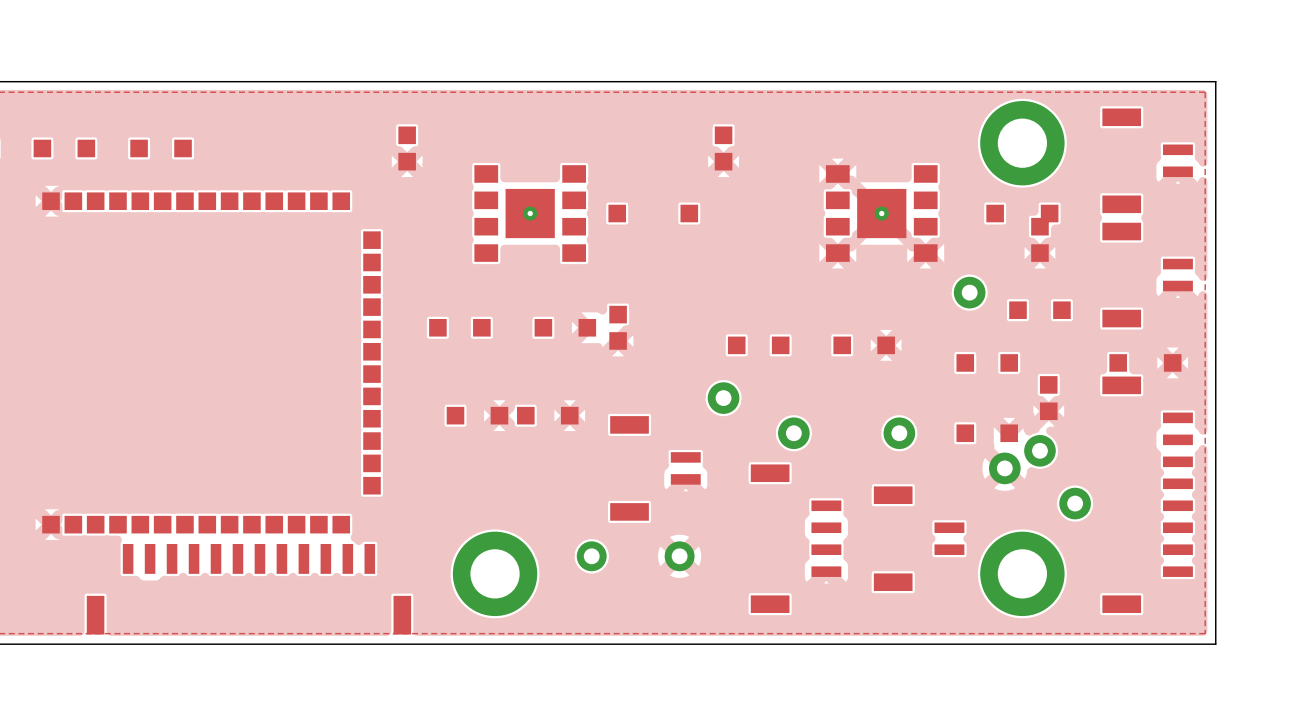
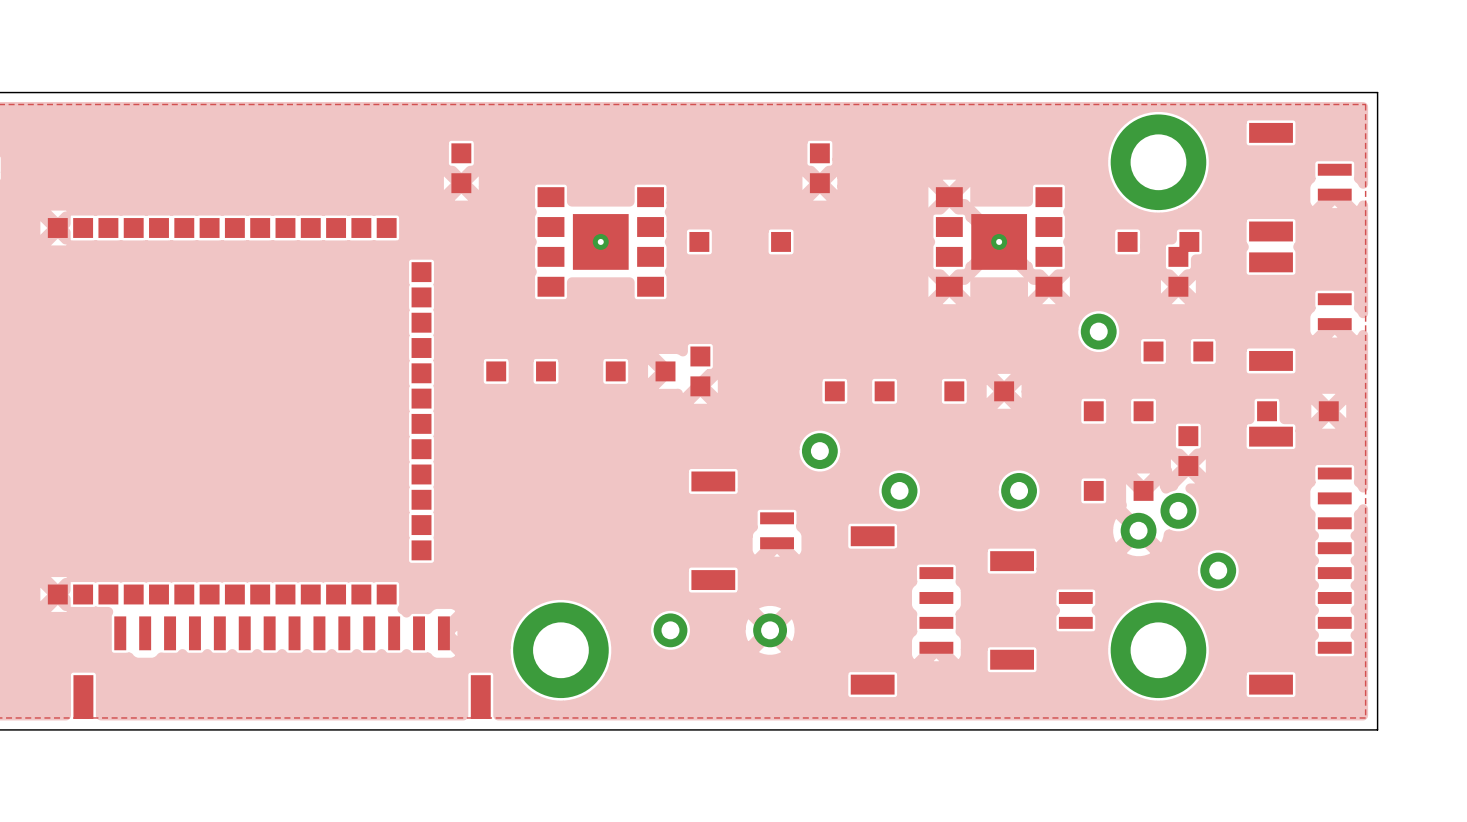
part: (64, 148) -> none
part: (161, 148) -> none
part: (477, 415) -> none
part: (547, 415) -> none
part footprint: [86, 543, 412, 635] -> [73, 616, 491, 719]

